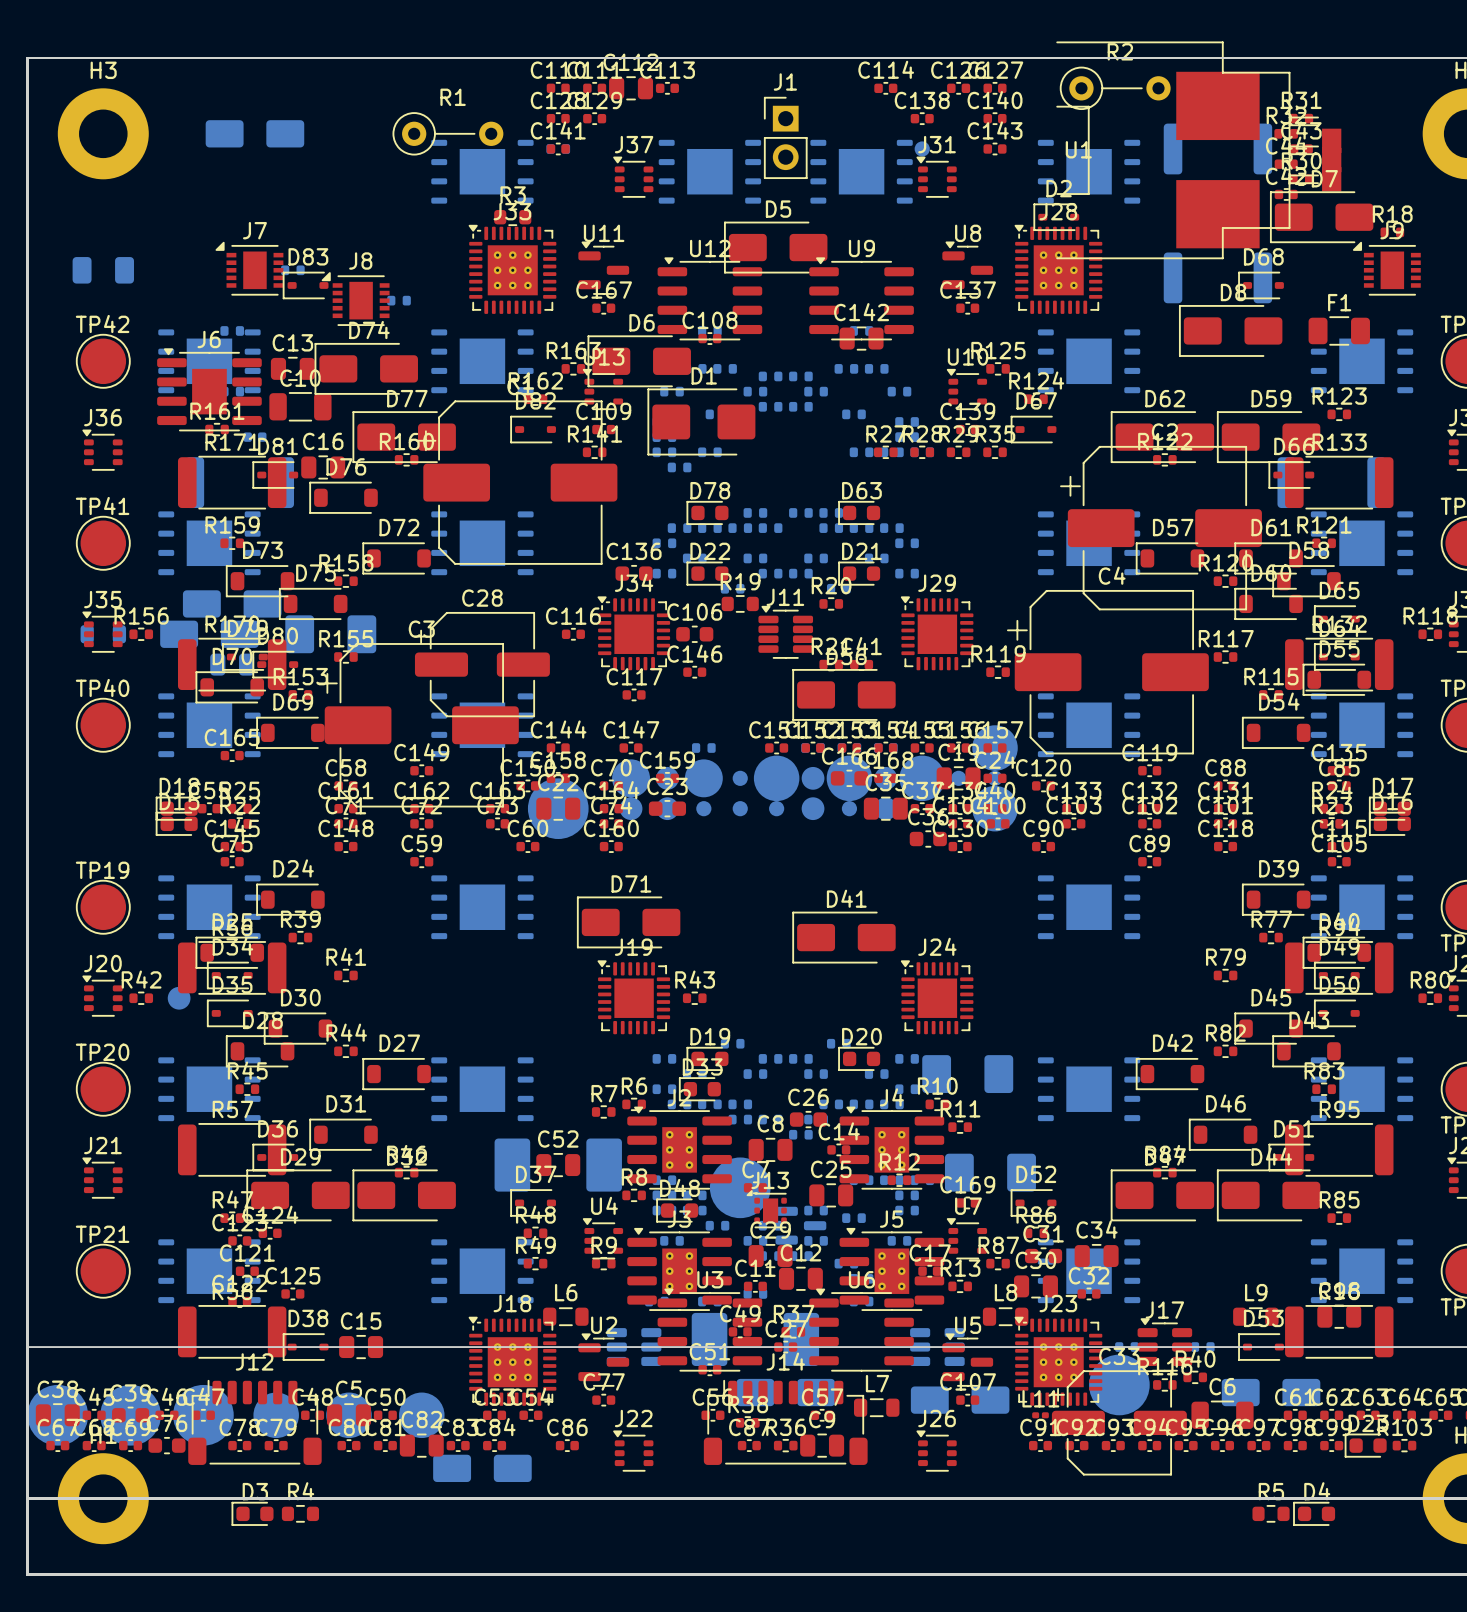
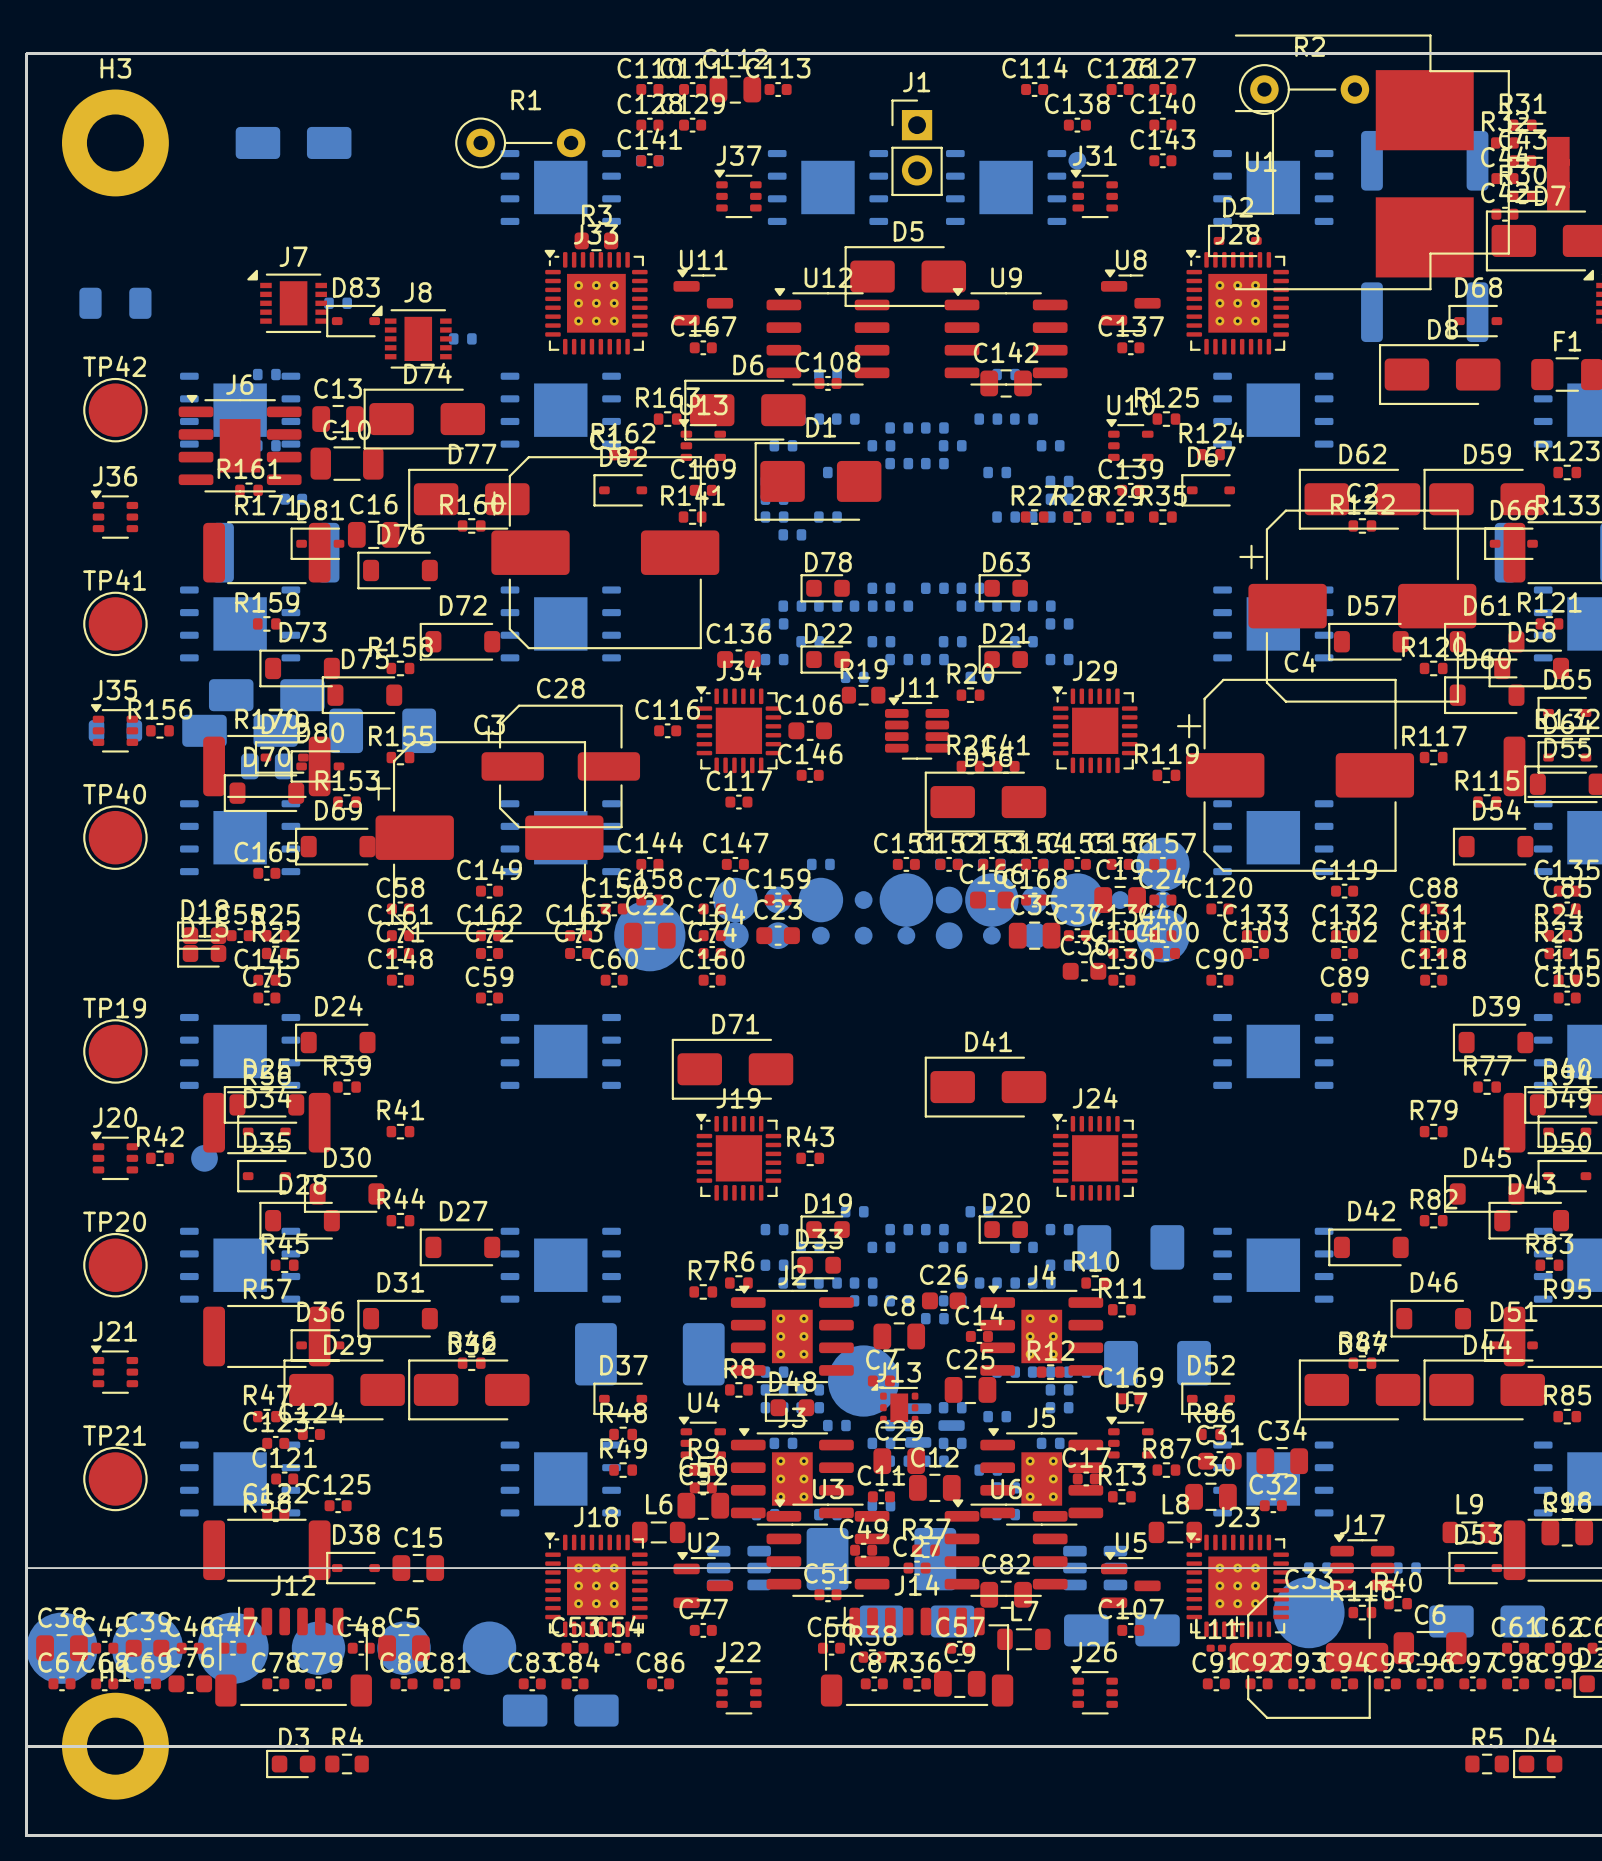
C52 position: (558, 1165) -> (703, 1505)
C50 position: (385, 1415) -> (703, 1487)
C82 position: (421, 1445) -> (1006, 1594)

